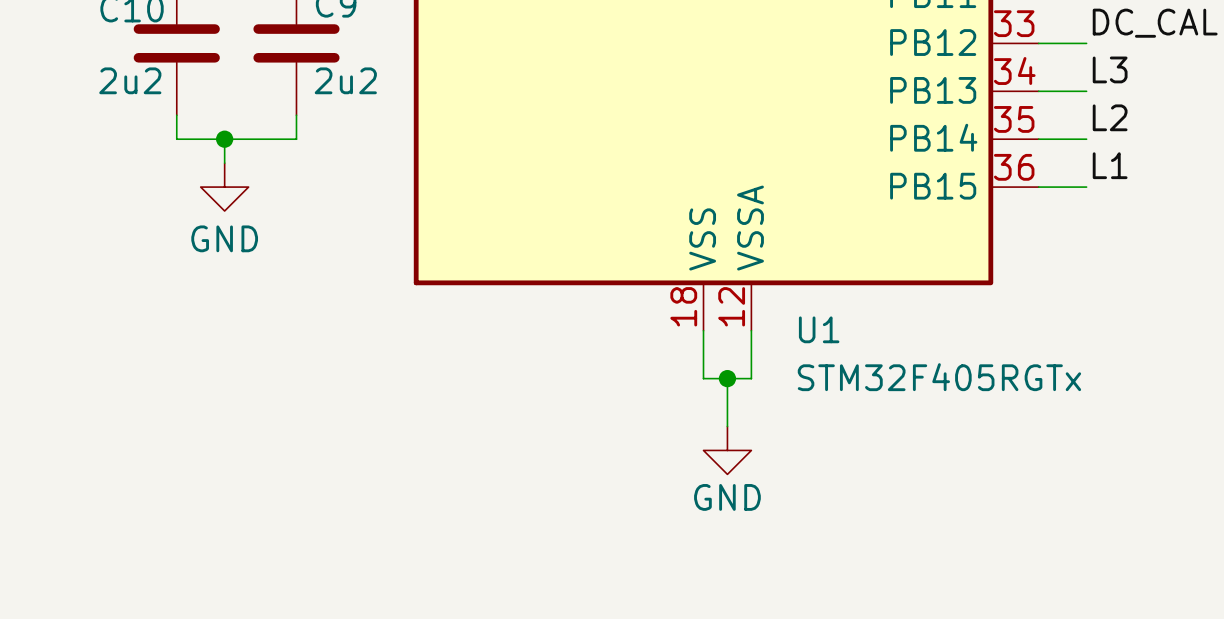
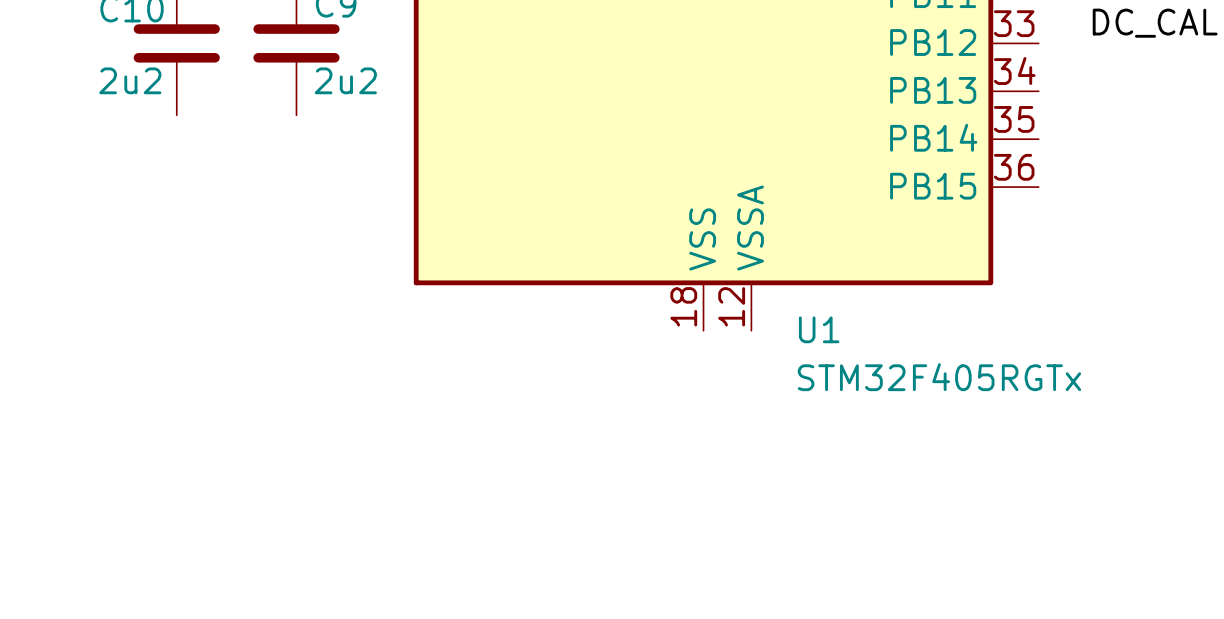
wire: (1038, 43) (1086, 43) -> none
label: L3 (1110, 69) -> none
wire: (1038, 91) (1086, 91) -> none
wire: (176, 115) (176, 139) (296, 139) (296, 115) -> none
label: L2 (1110, 117) -> none
wire: (224, 139) (224, 163) -> none
junction: (224, 139) -> none
wire: (1038, 139) (1086, 139) -> none
label: L1 (1110, 165) -> none
power symbol: GND (224, 187) -> none
wire: (1038, 187) (1086, 187) -> none
wire: (703, 330) (703, 378) (751, 378) (751, 330) -> none
wire: (727, 378) (727, 426) -> none
junction: (727, 378) -> none
power symbol: GND (727, 450) -> none

